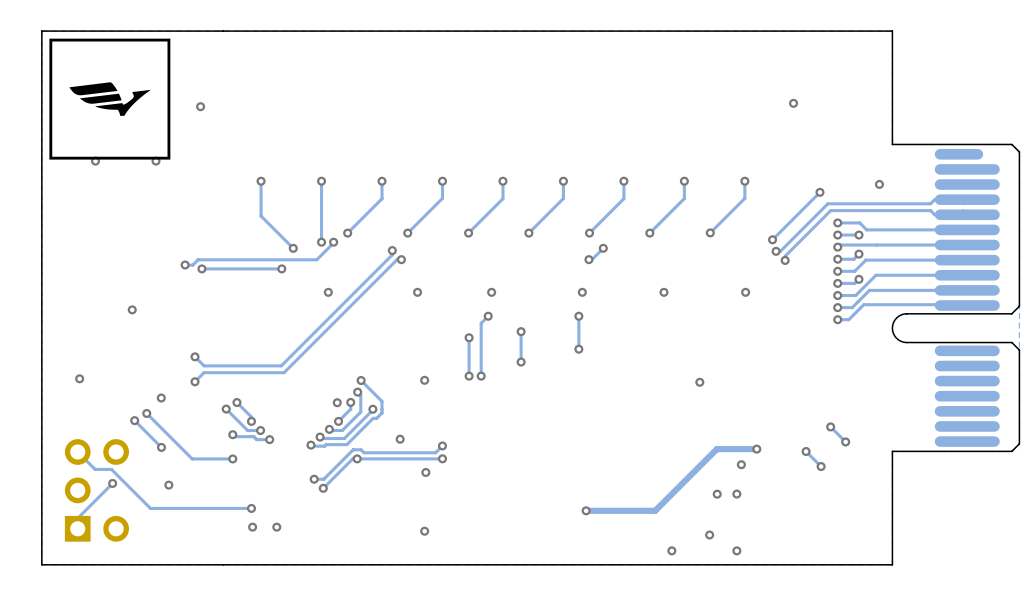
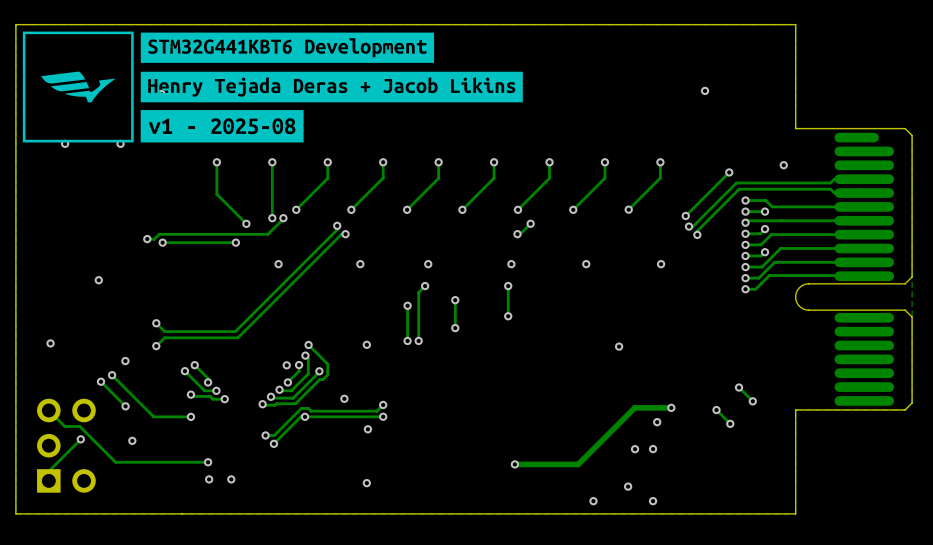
drawing: none -> [140, 32, 523, 143]

